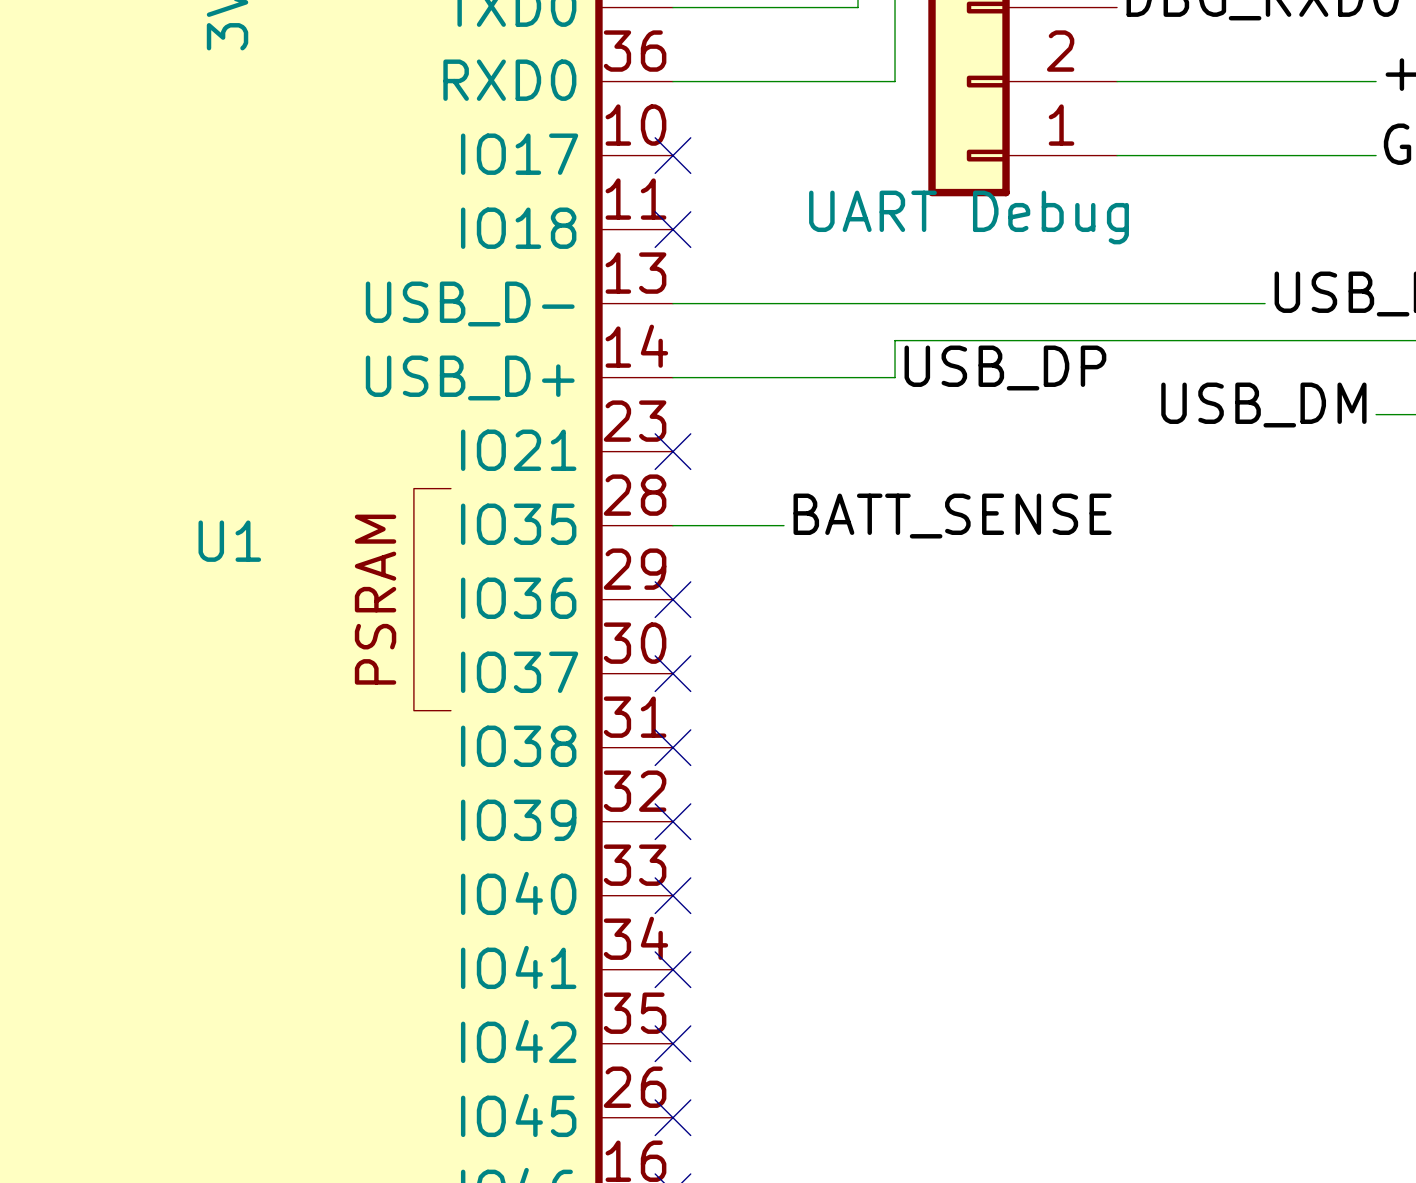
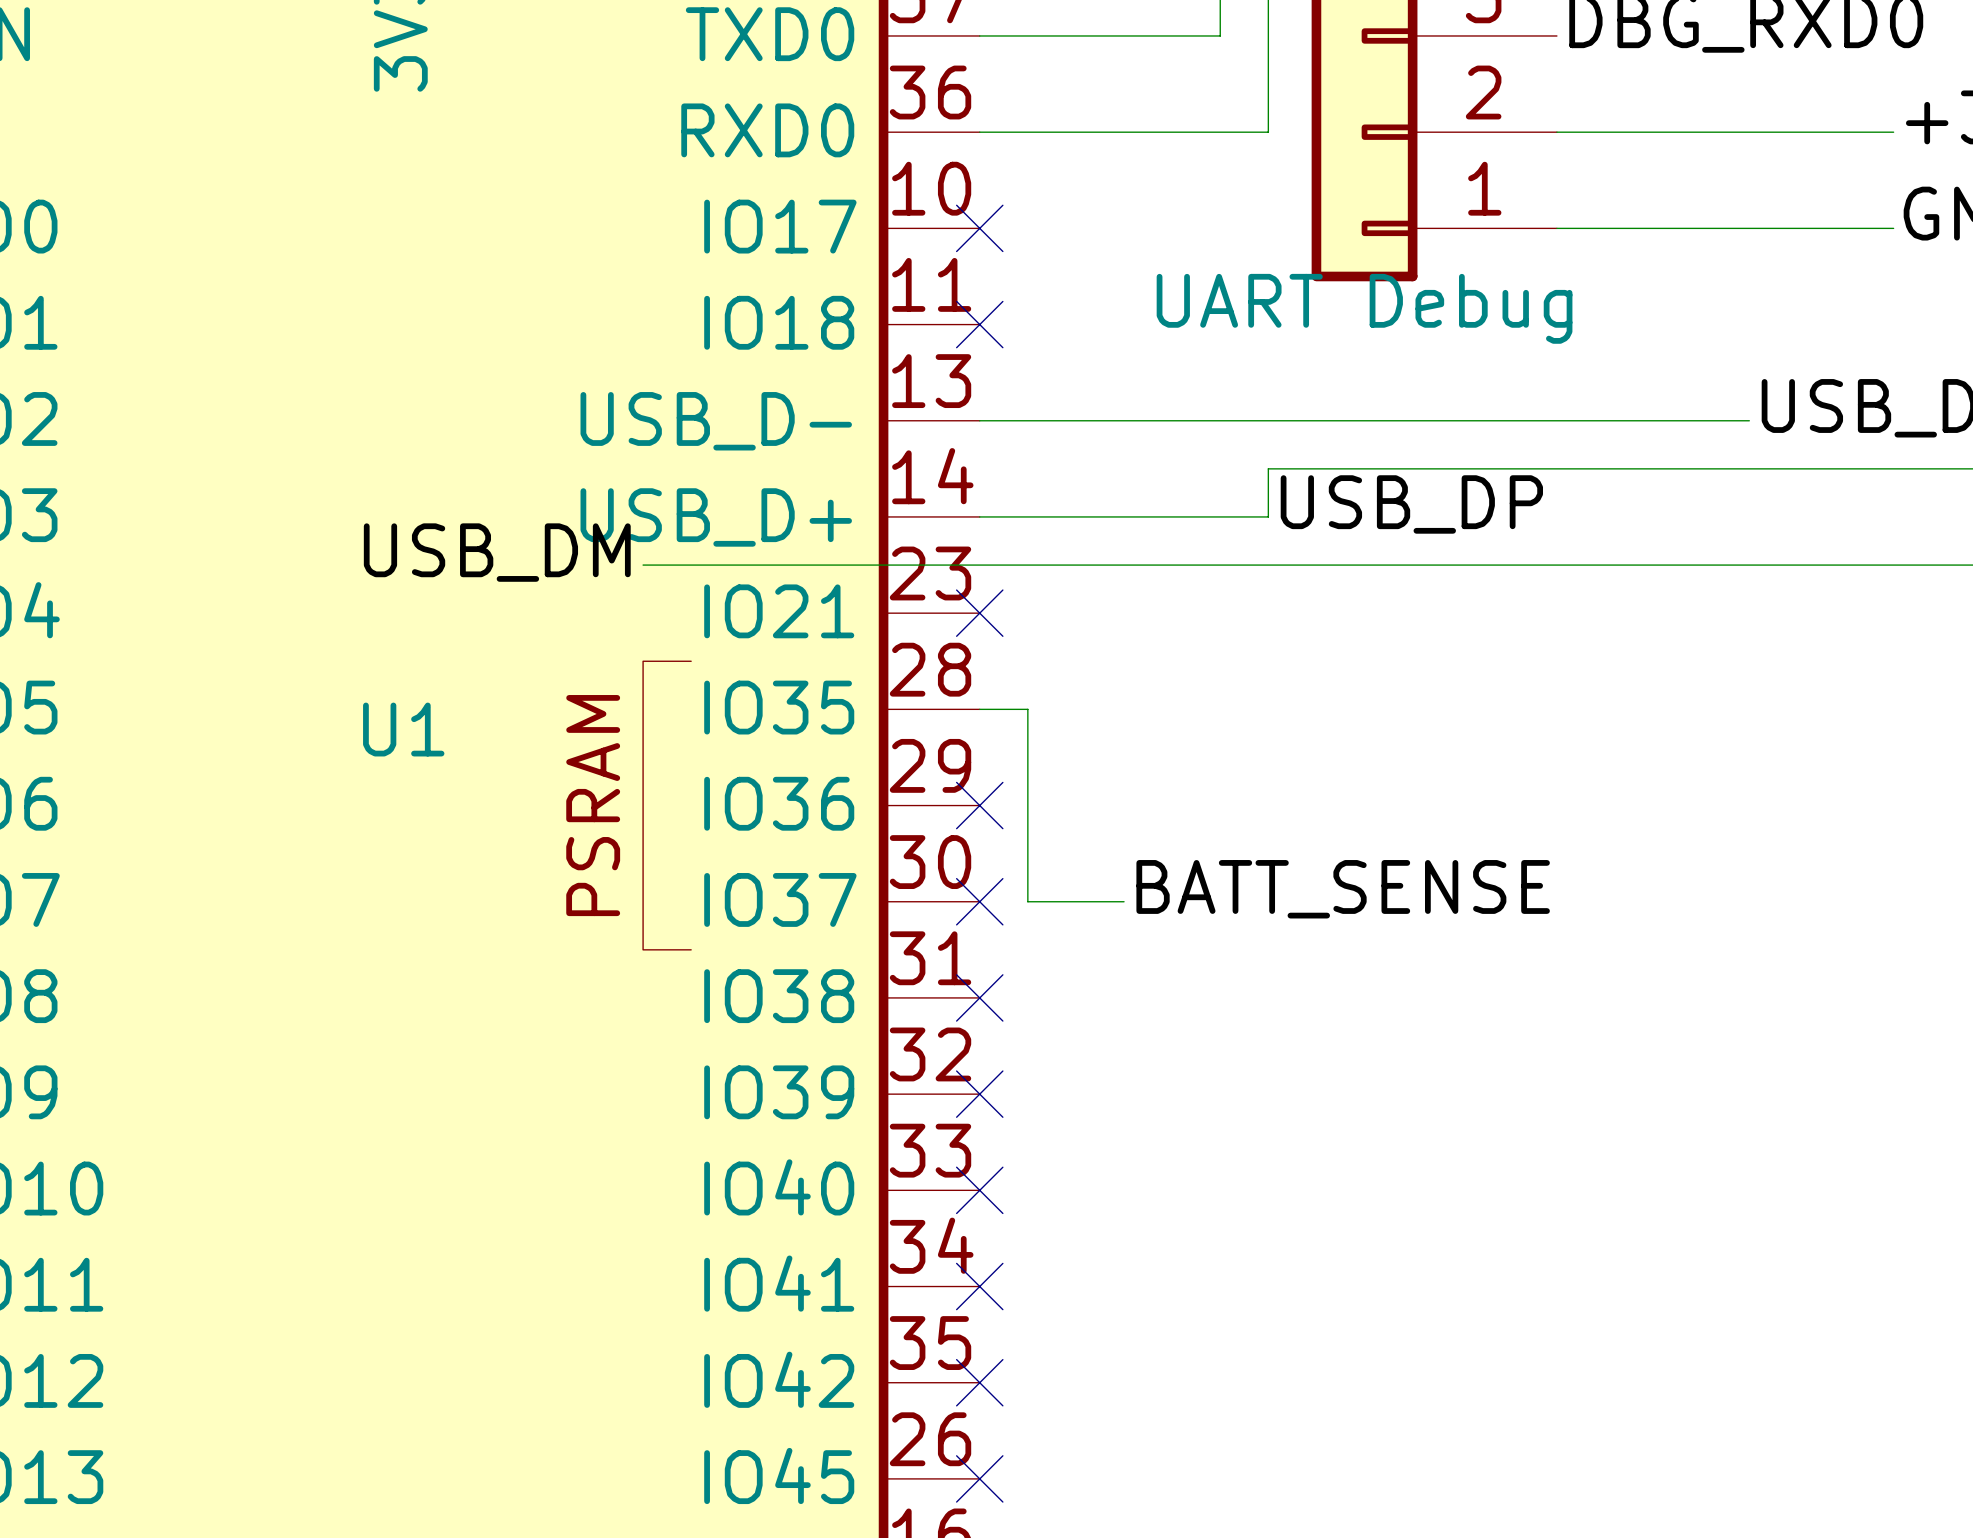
label: none -> USB_DM (497, 552)
label: USB_DM (1263, 405) -> none
wire: none -> (643, 565) (1893, 565)
label position: BATT_SENSE (952, 516) -> BATT_SENSE (1343, 889)
wire: (709, 525) (783, 525) -> (1027, 709) (1027, 901) (1124, 901)

